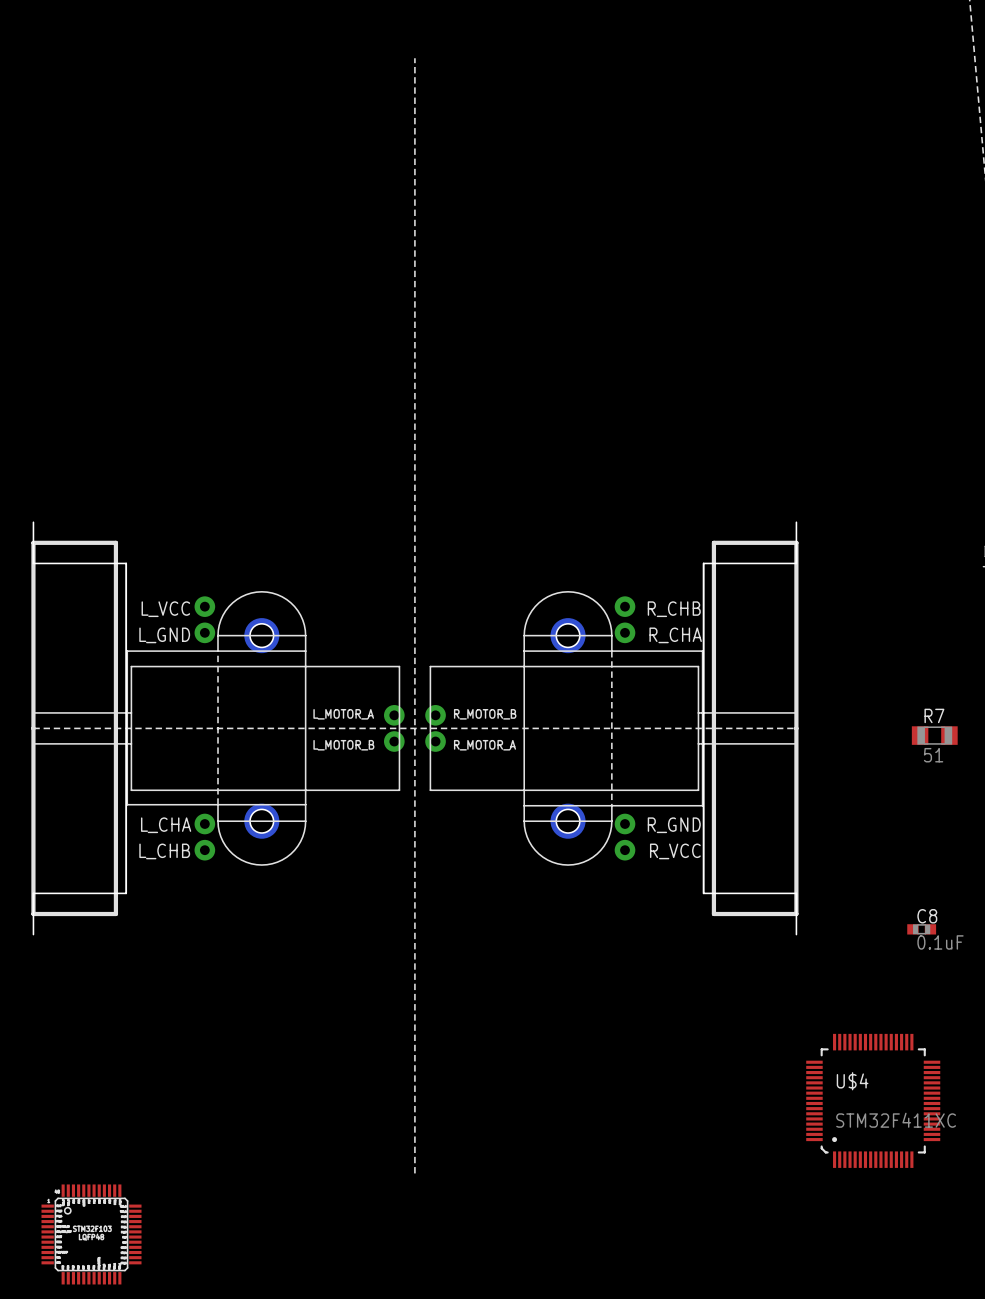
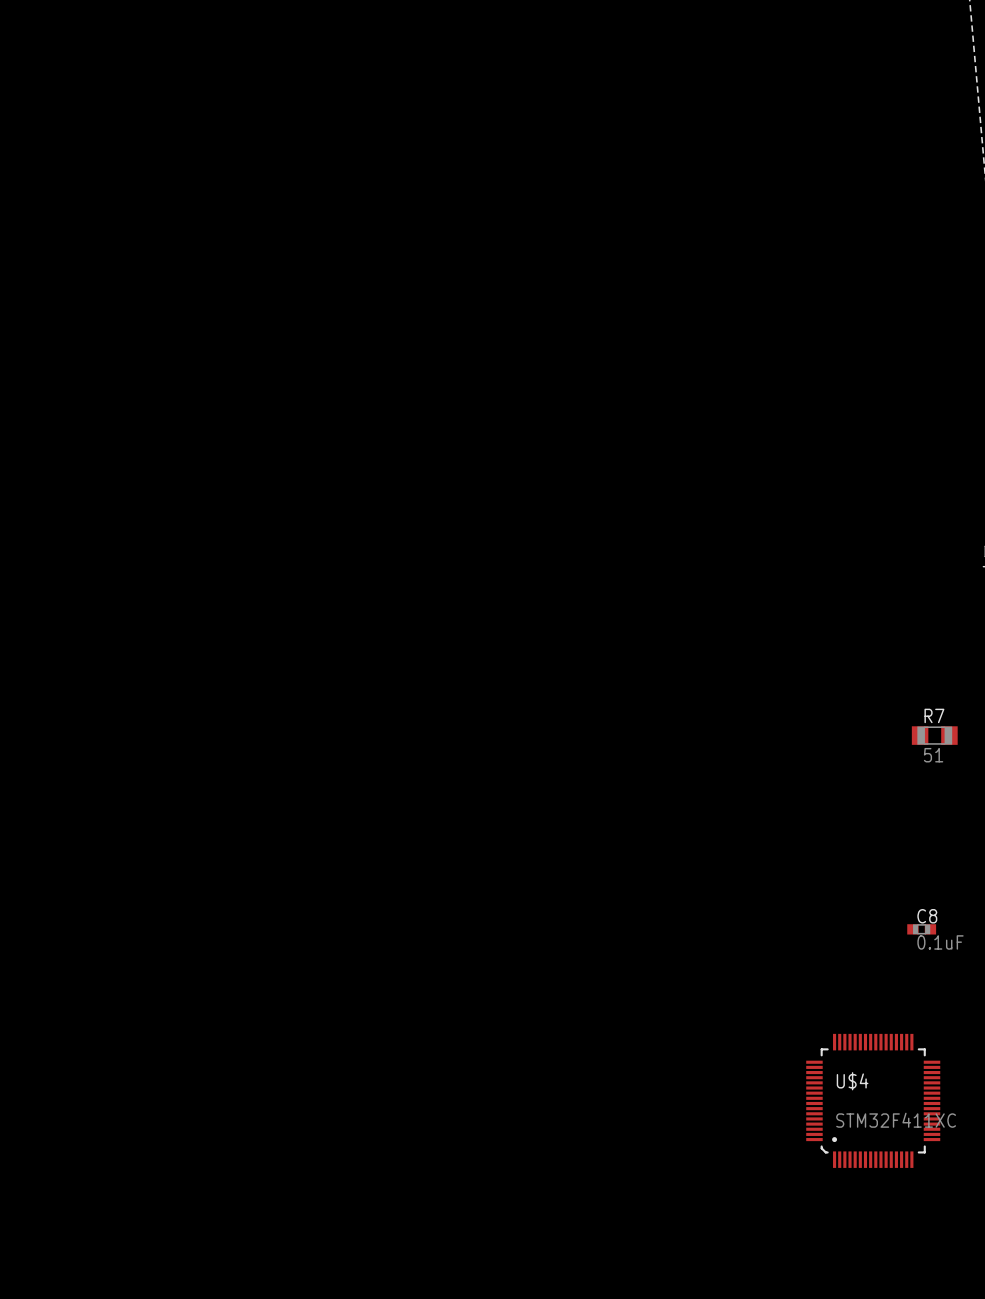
part: (414, 615) -> none
part: (91, 1234) -> none

